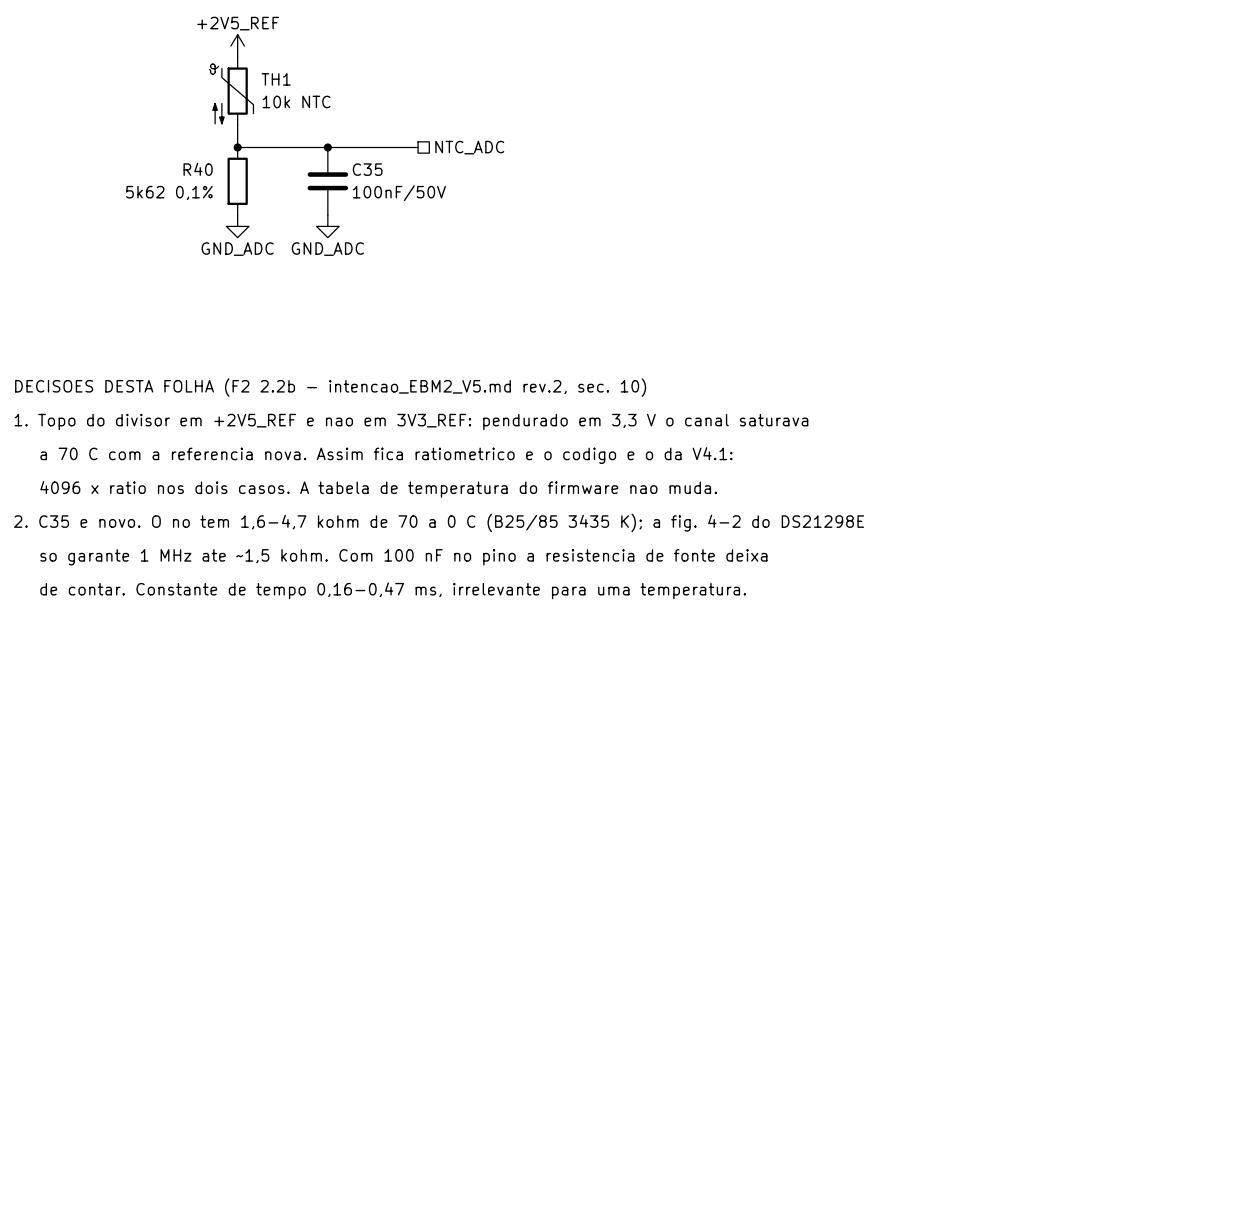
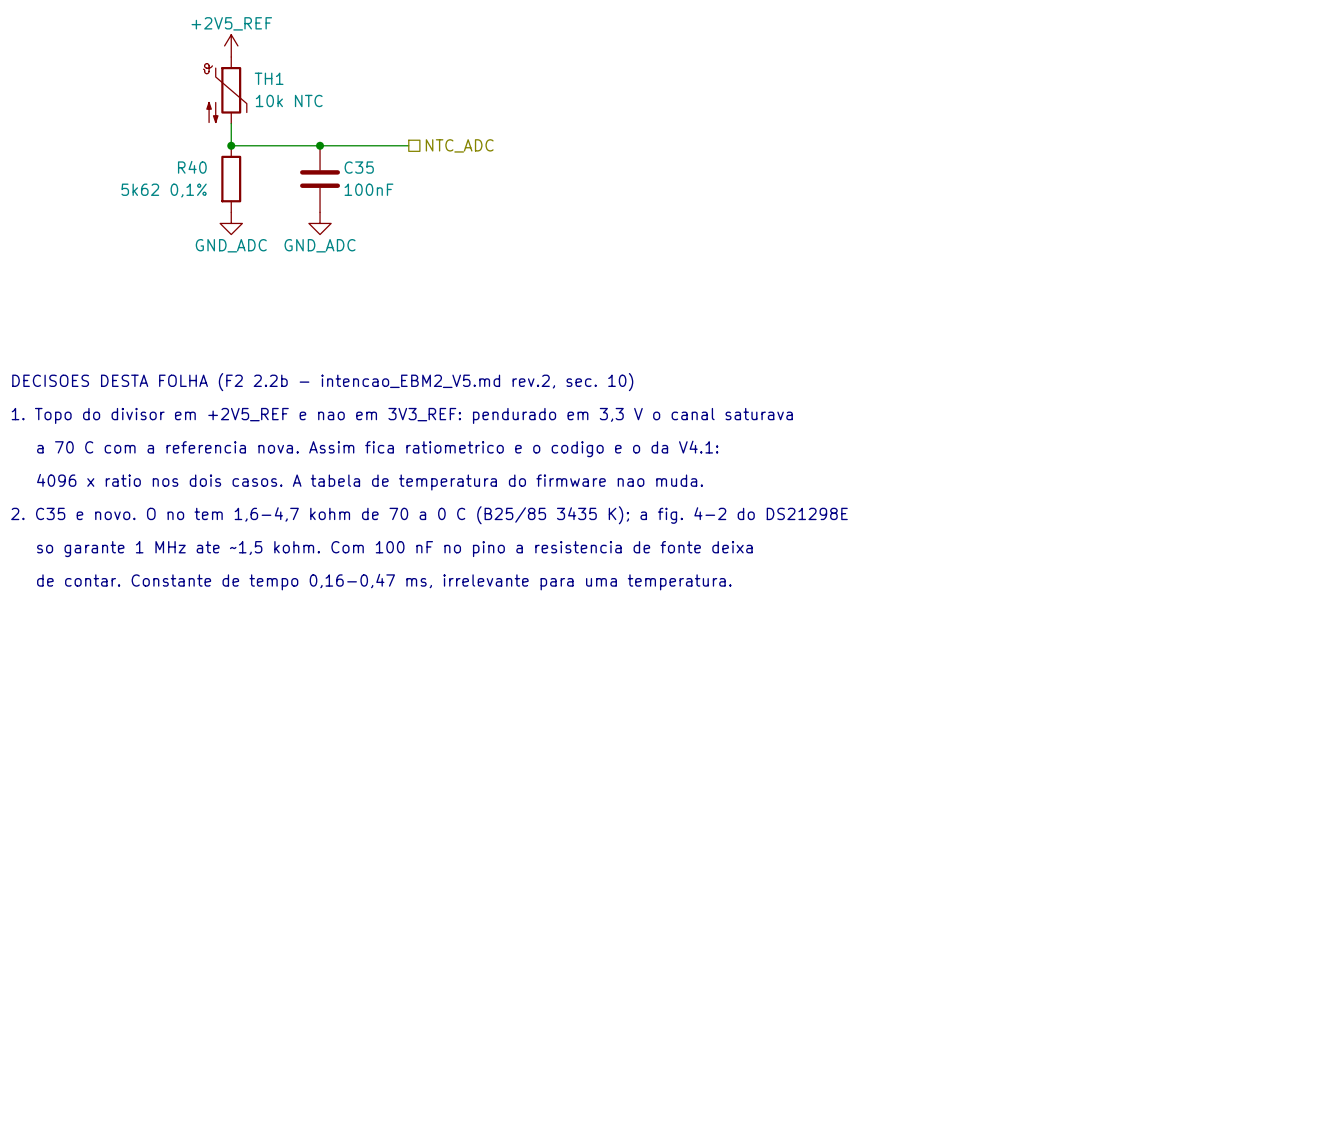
C35 value: 100nF/50V (399, 193) -> 100nF (368, 189)

